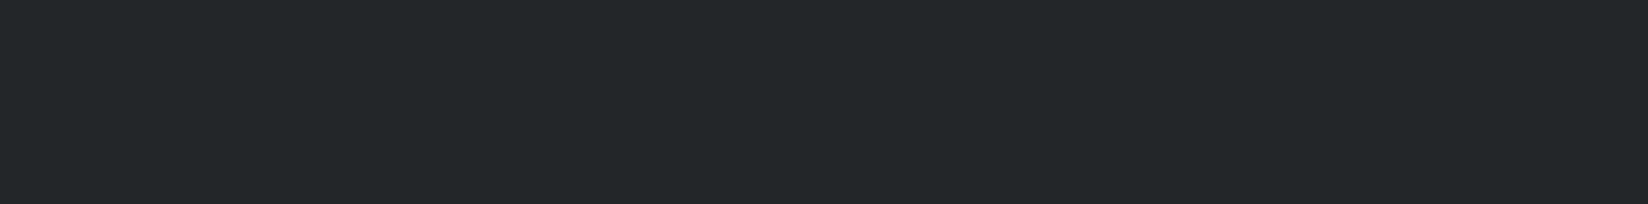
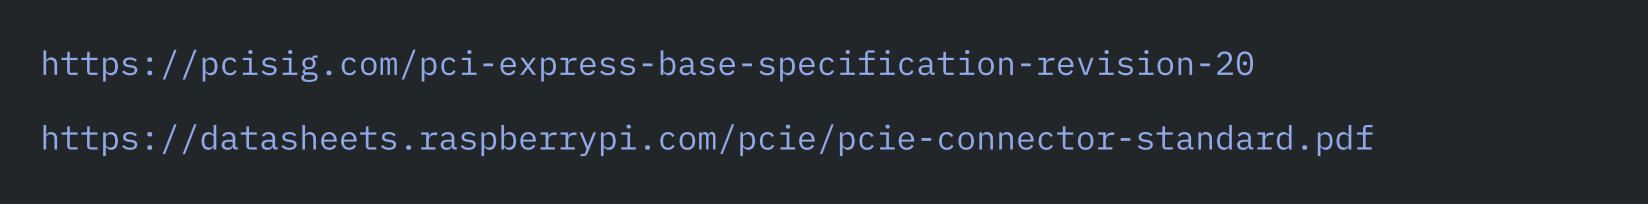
text: none -> https://pcisig.com/pci-express-base-specification-revision-20 (648, 65)
text: none -> https://datasheets.raspberrypi.com/pcie/pcie-connector-standard.pdf (708, 140)

